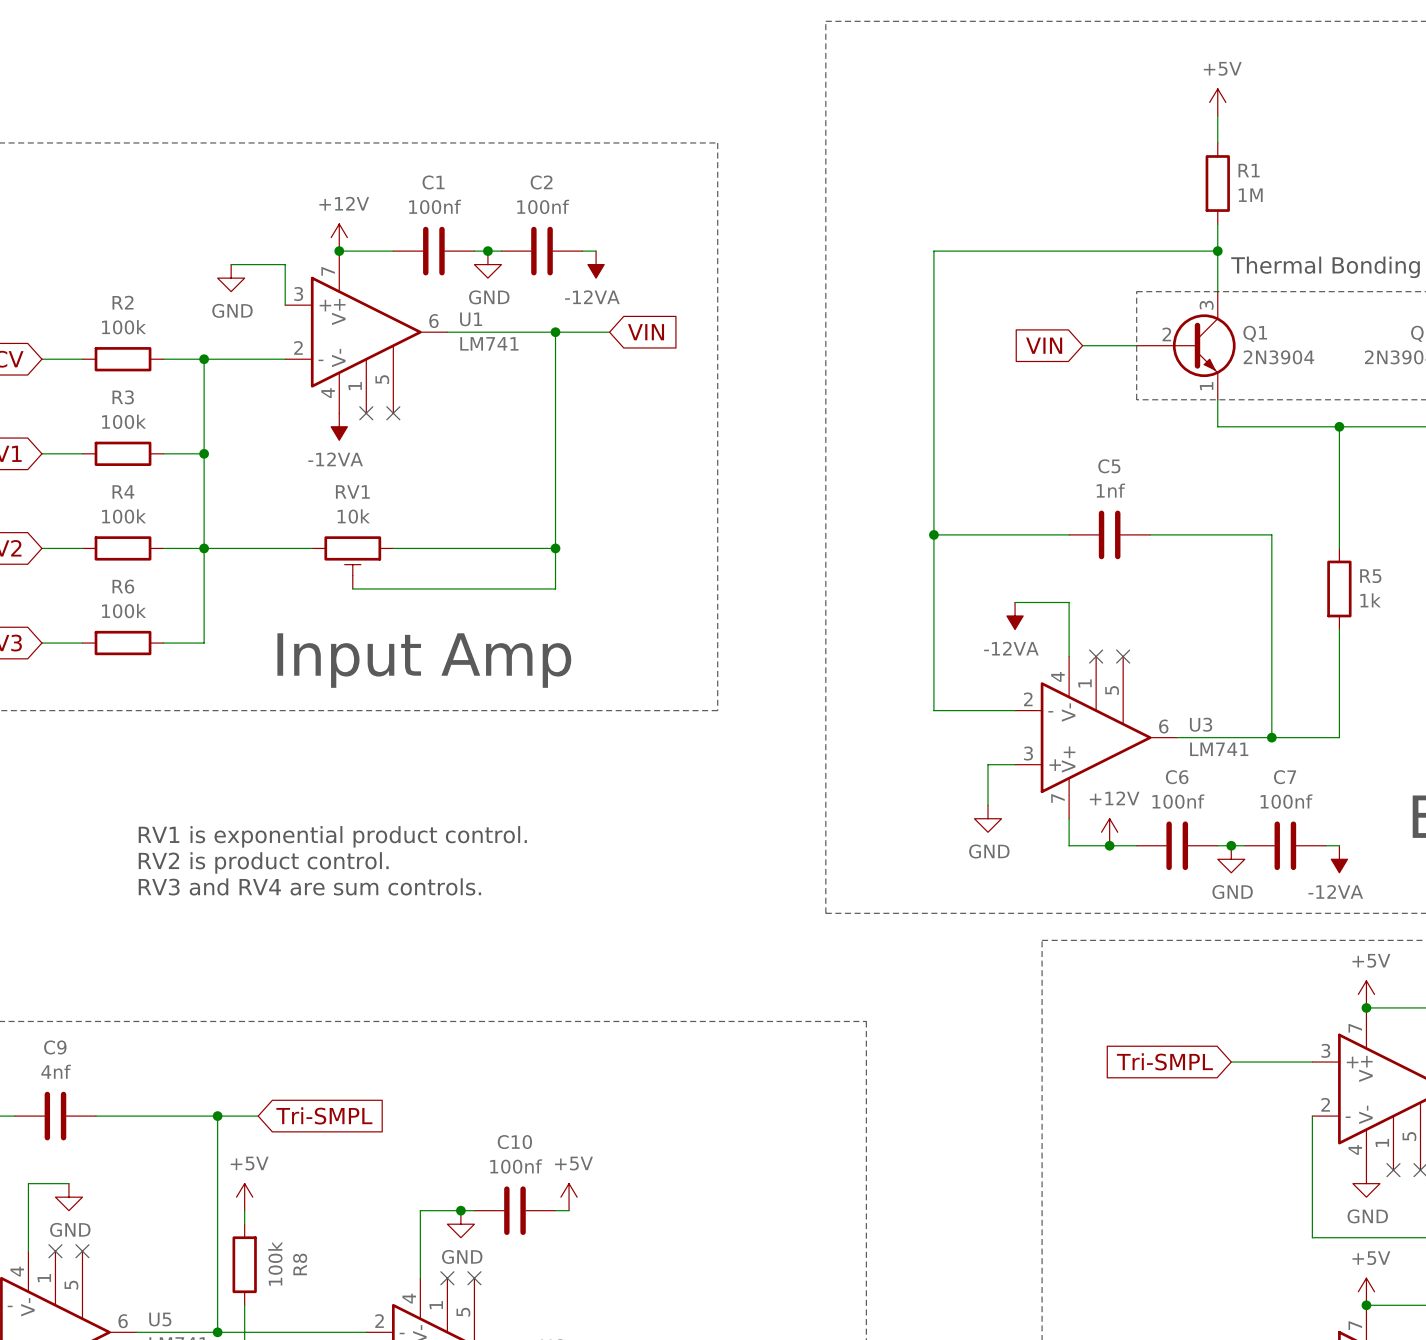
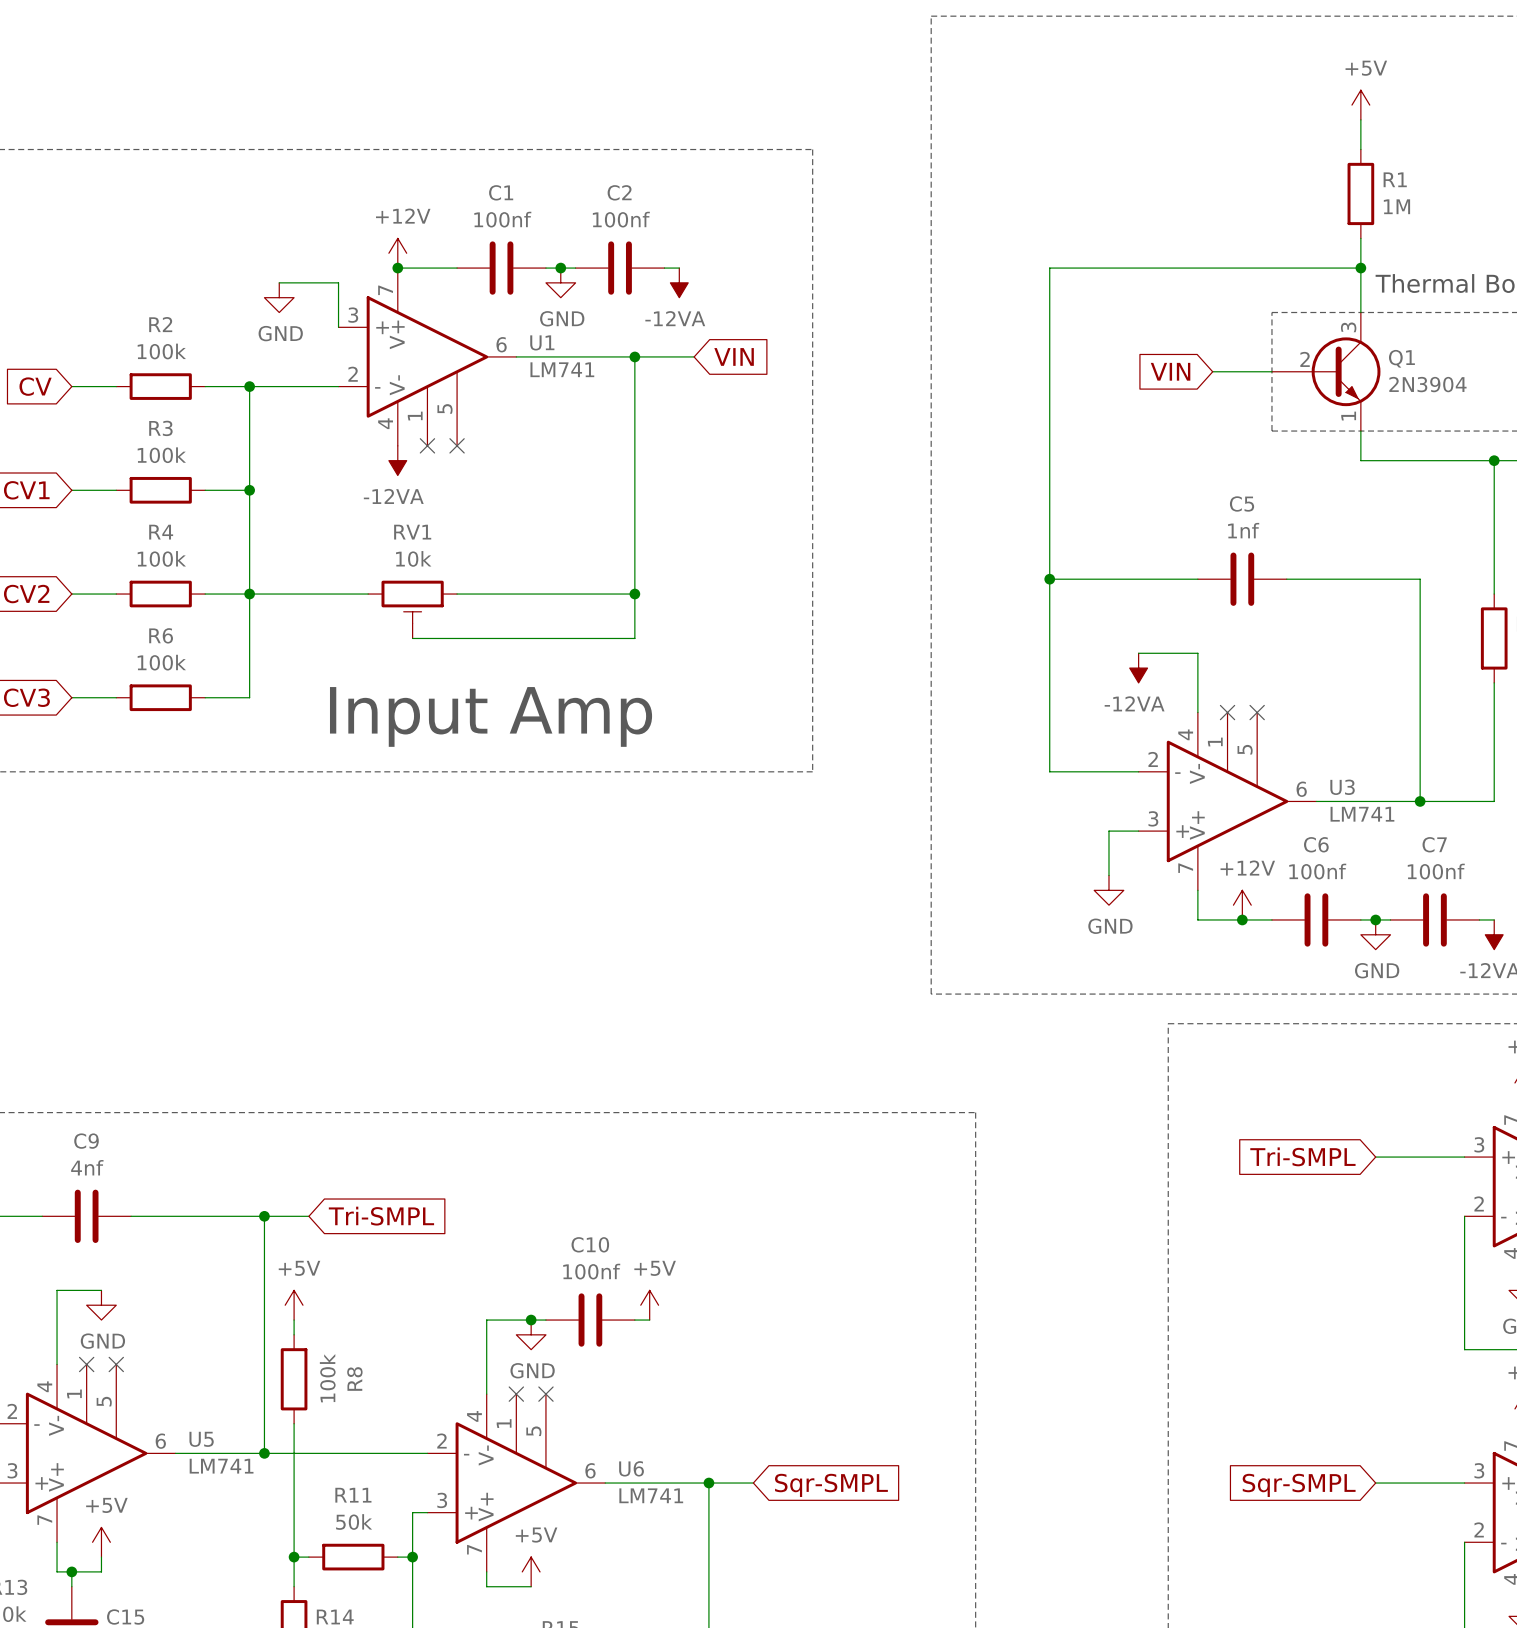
text: RV1 is exponential product control. (332, 836) -> none
text: RV2 is product control. (263, 862) -> none
text: RV3 and RV4 are sum controls. (309, 886) -> none

